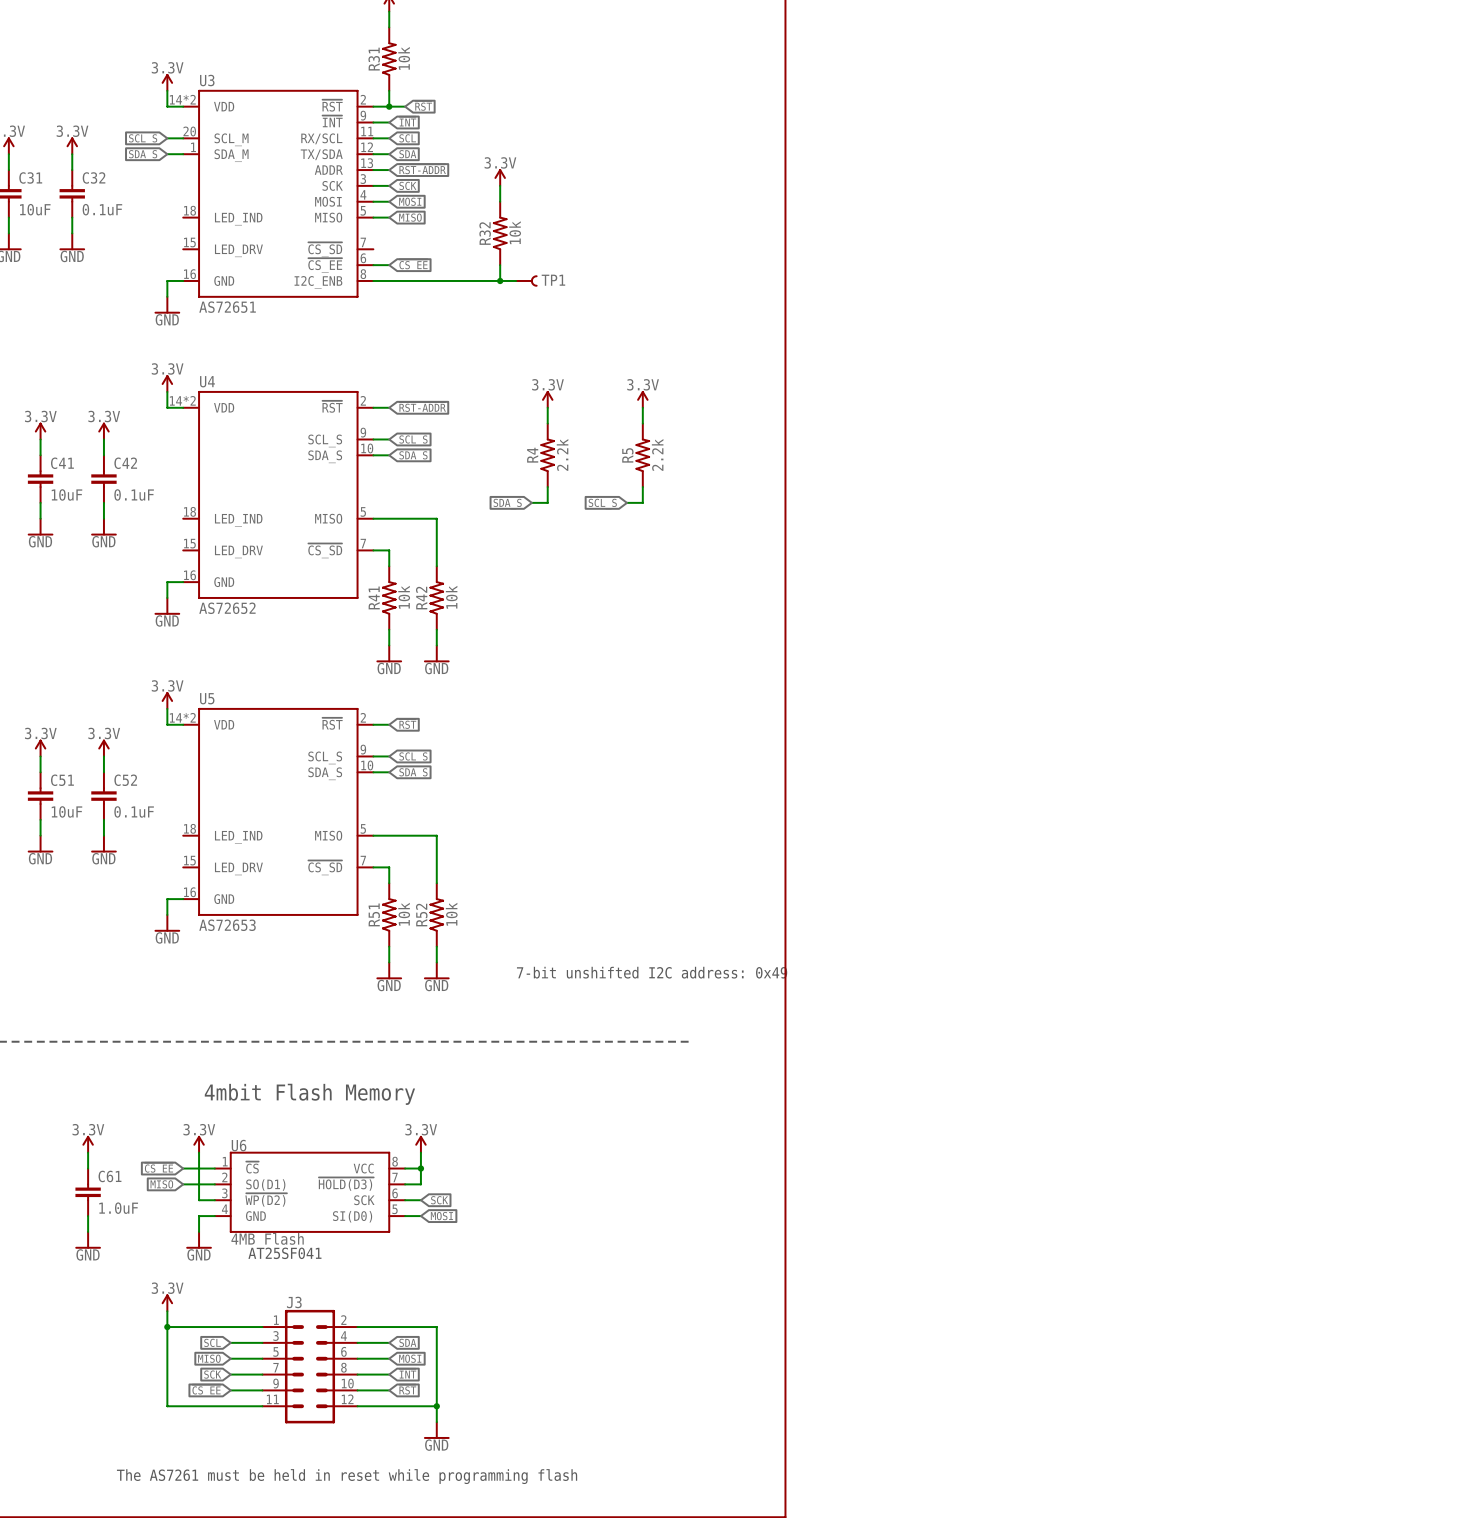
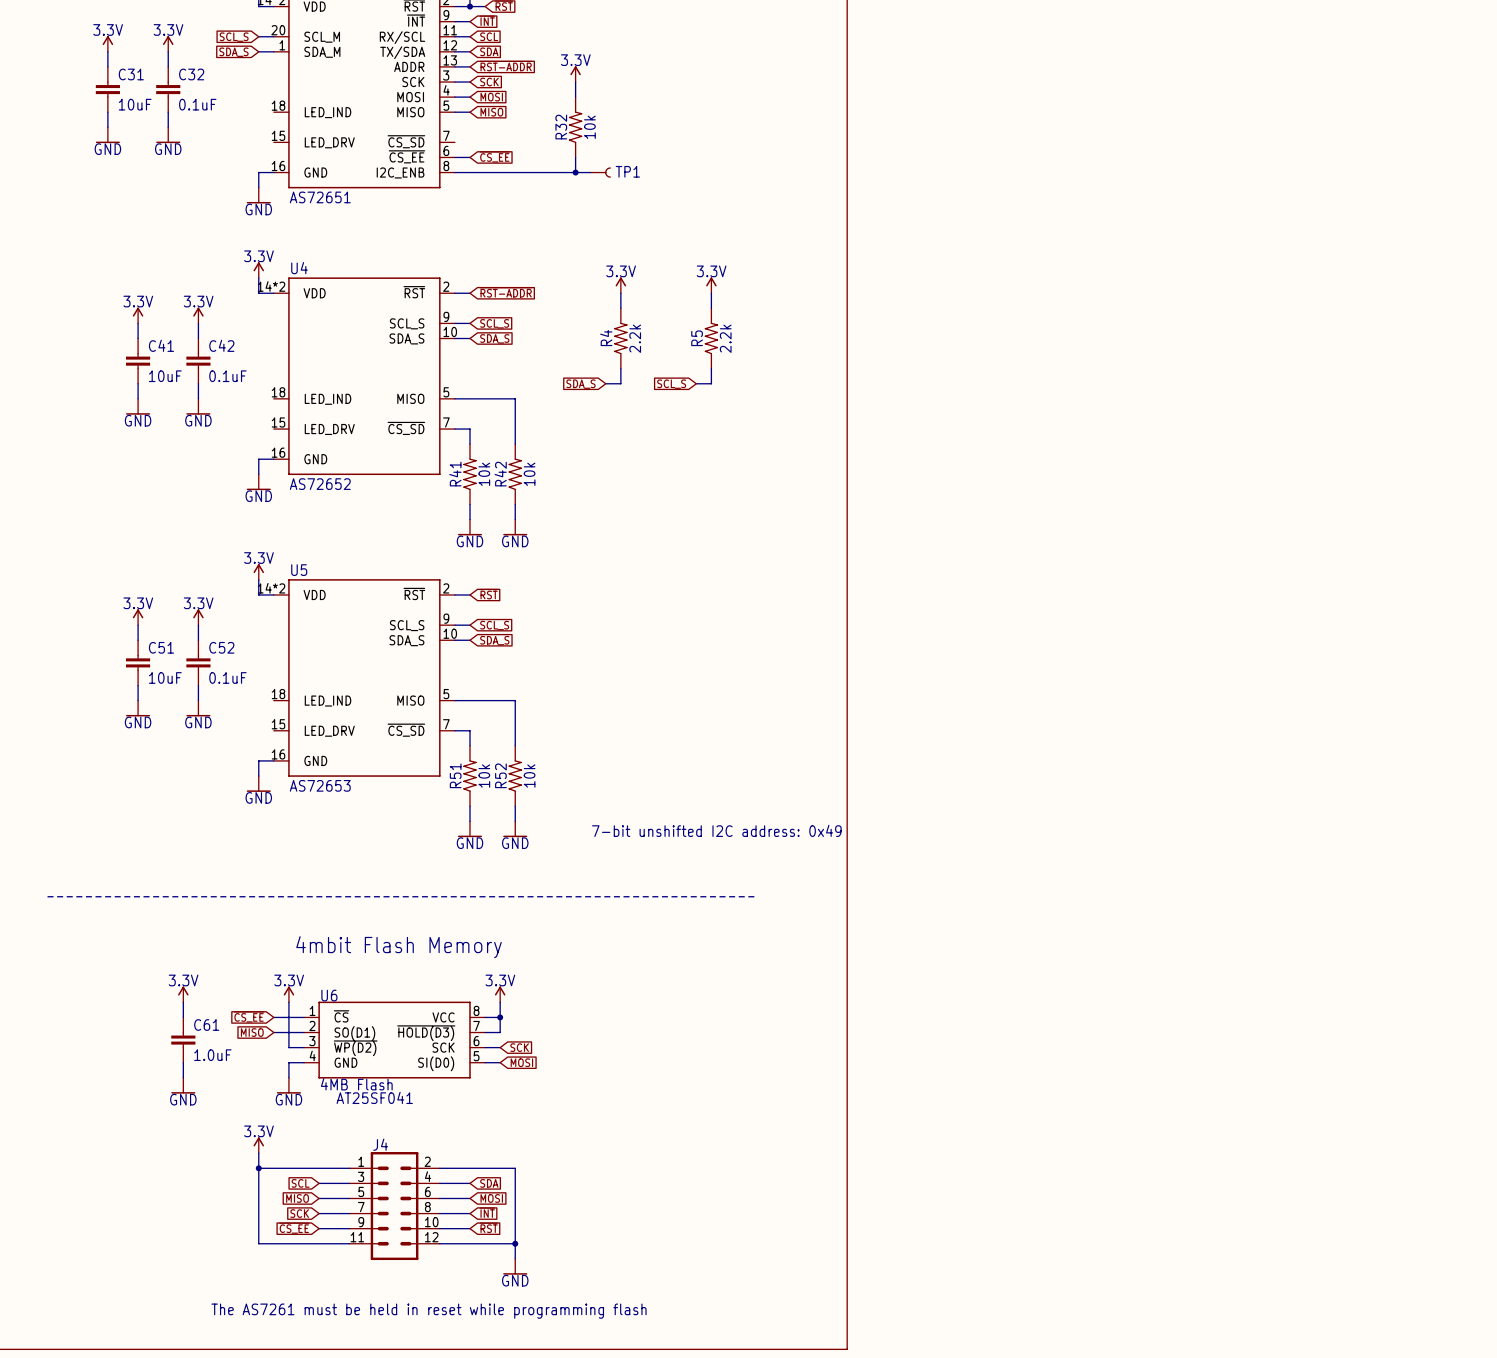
J3 name: J3 (294, 1302) -> J4 (380, 1144)

